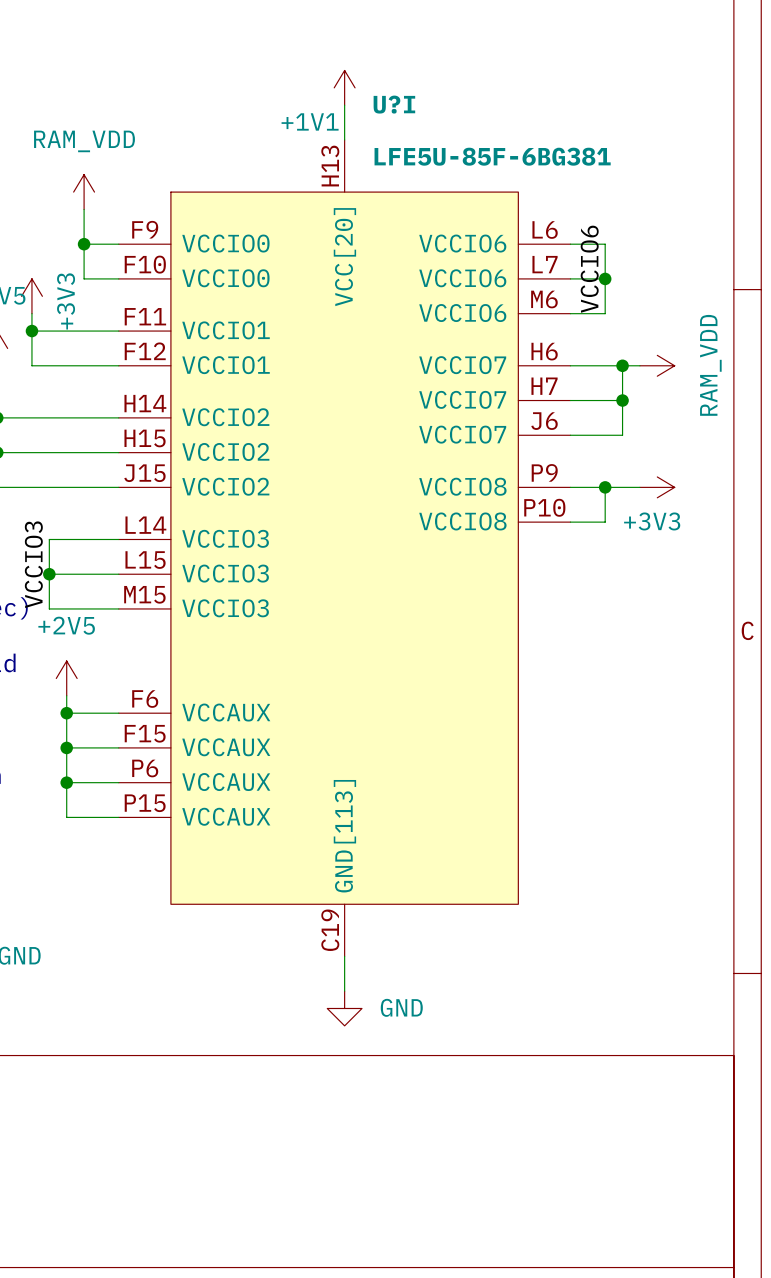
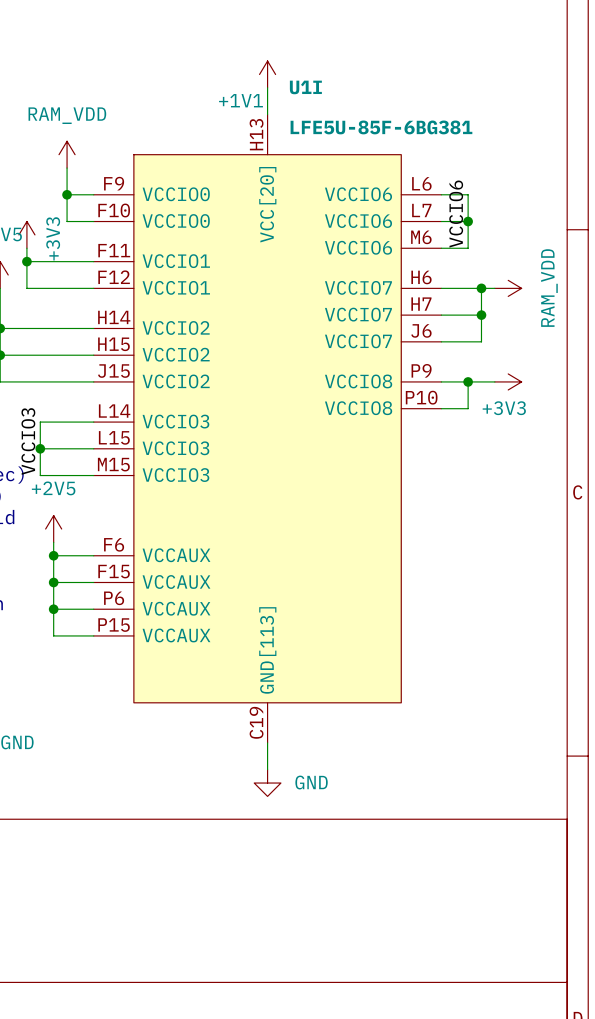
U?I name: U?I (394, 104) -> U1I (305, 87)

